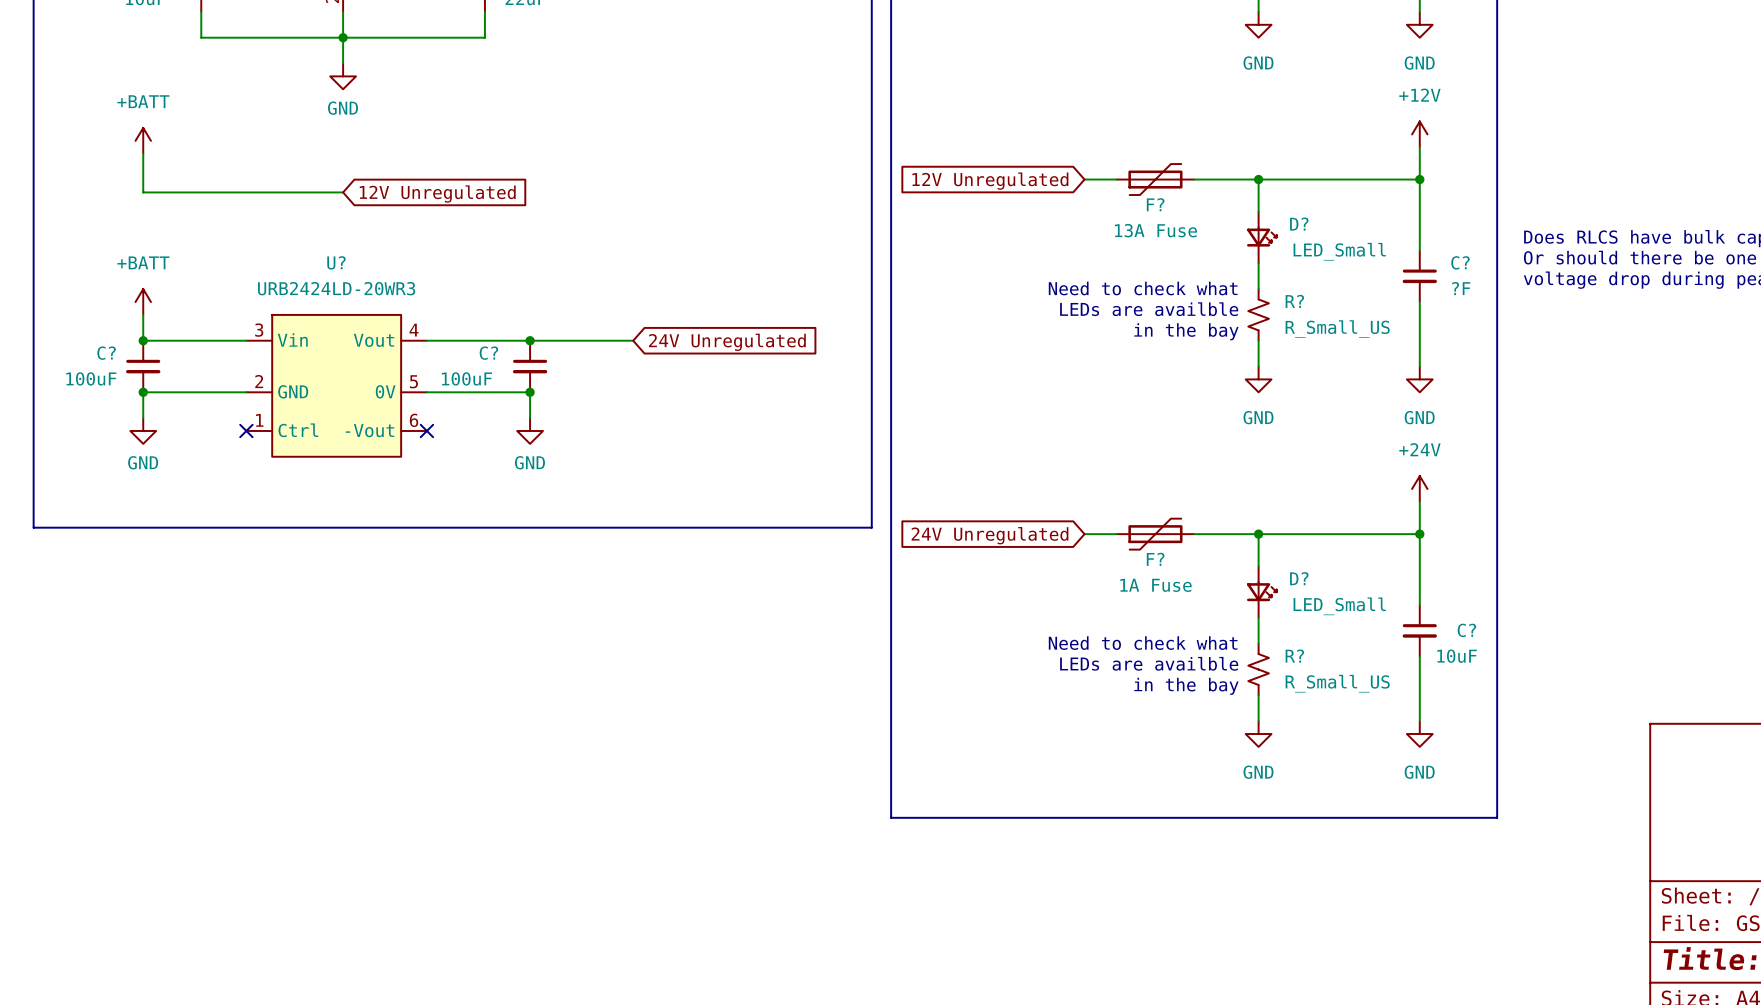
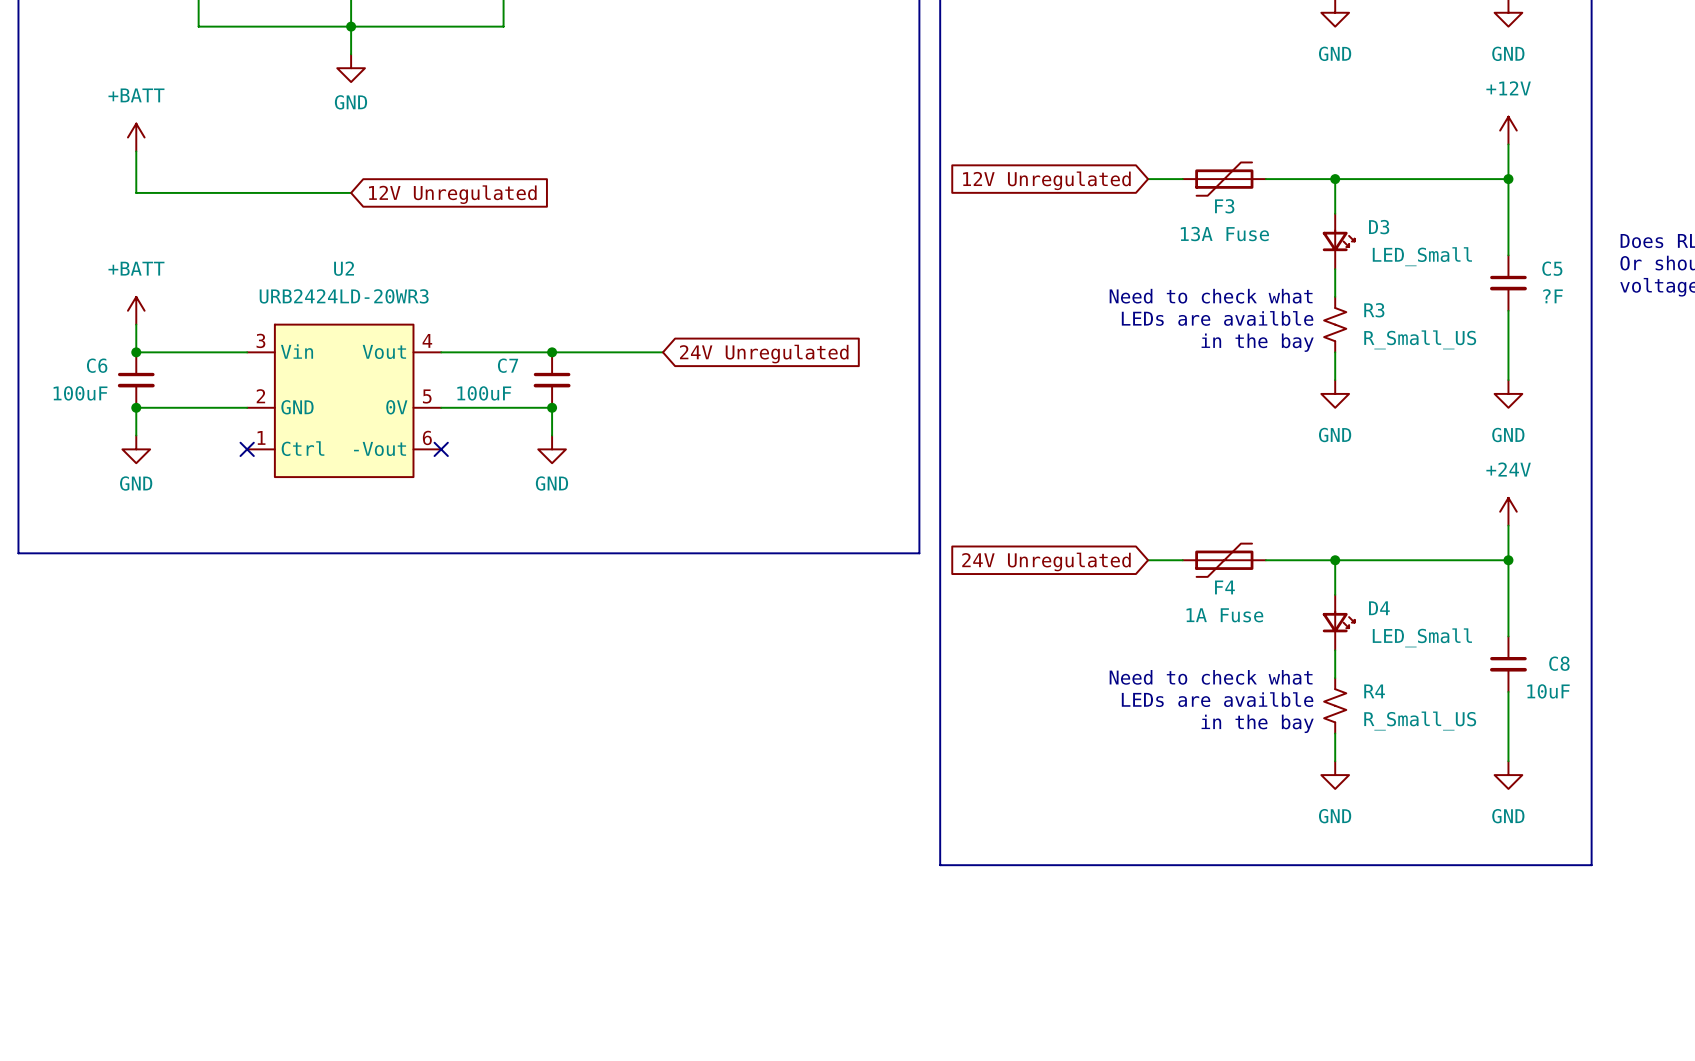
F? name: F? (1155, 204) -> F3 (1224, 206)
D? name: D? (1299, 224) -> D3 (1379, 227)
U? name: U? (336, 262) -> U2 (344, 268)
C? name: C? (1460, 262) -> C5 (1552, 268)
R? name: R? (1294, 301) -> R3 (1374, 310)
C? name: C? (106, 353) -> C6 (97, 365)
C? name: C? (488, 353) -> C7 (508, 365)
F? name: F? (1155, 559) -> F4 (1224, 587)
D? name: D? (1299, 578) -> D4 (1379, 608)
C? name: C? (1466, 630) -> C8 (1559, 663)
R? name: R? (1294, 656) -> R4 (1374, 691)

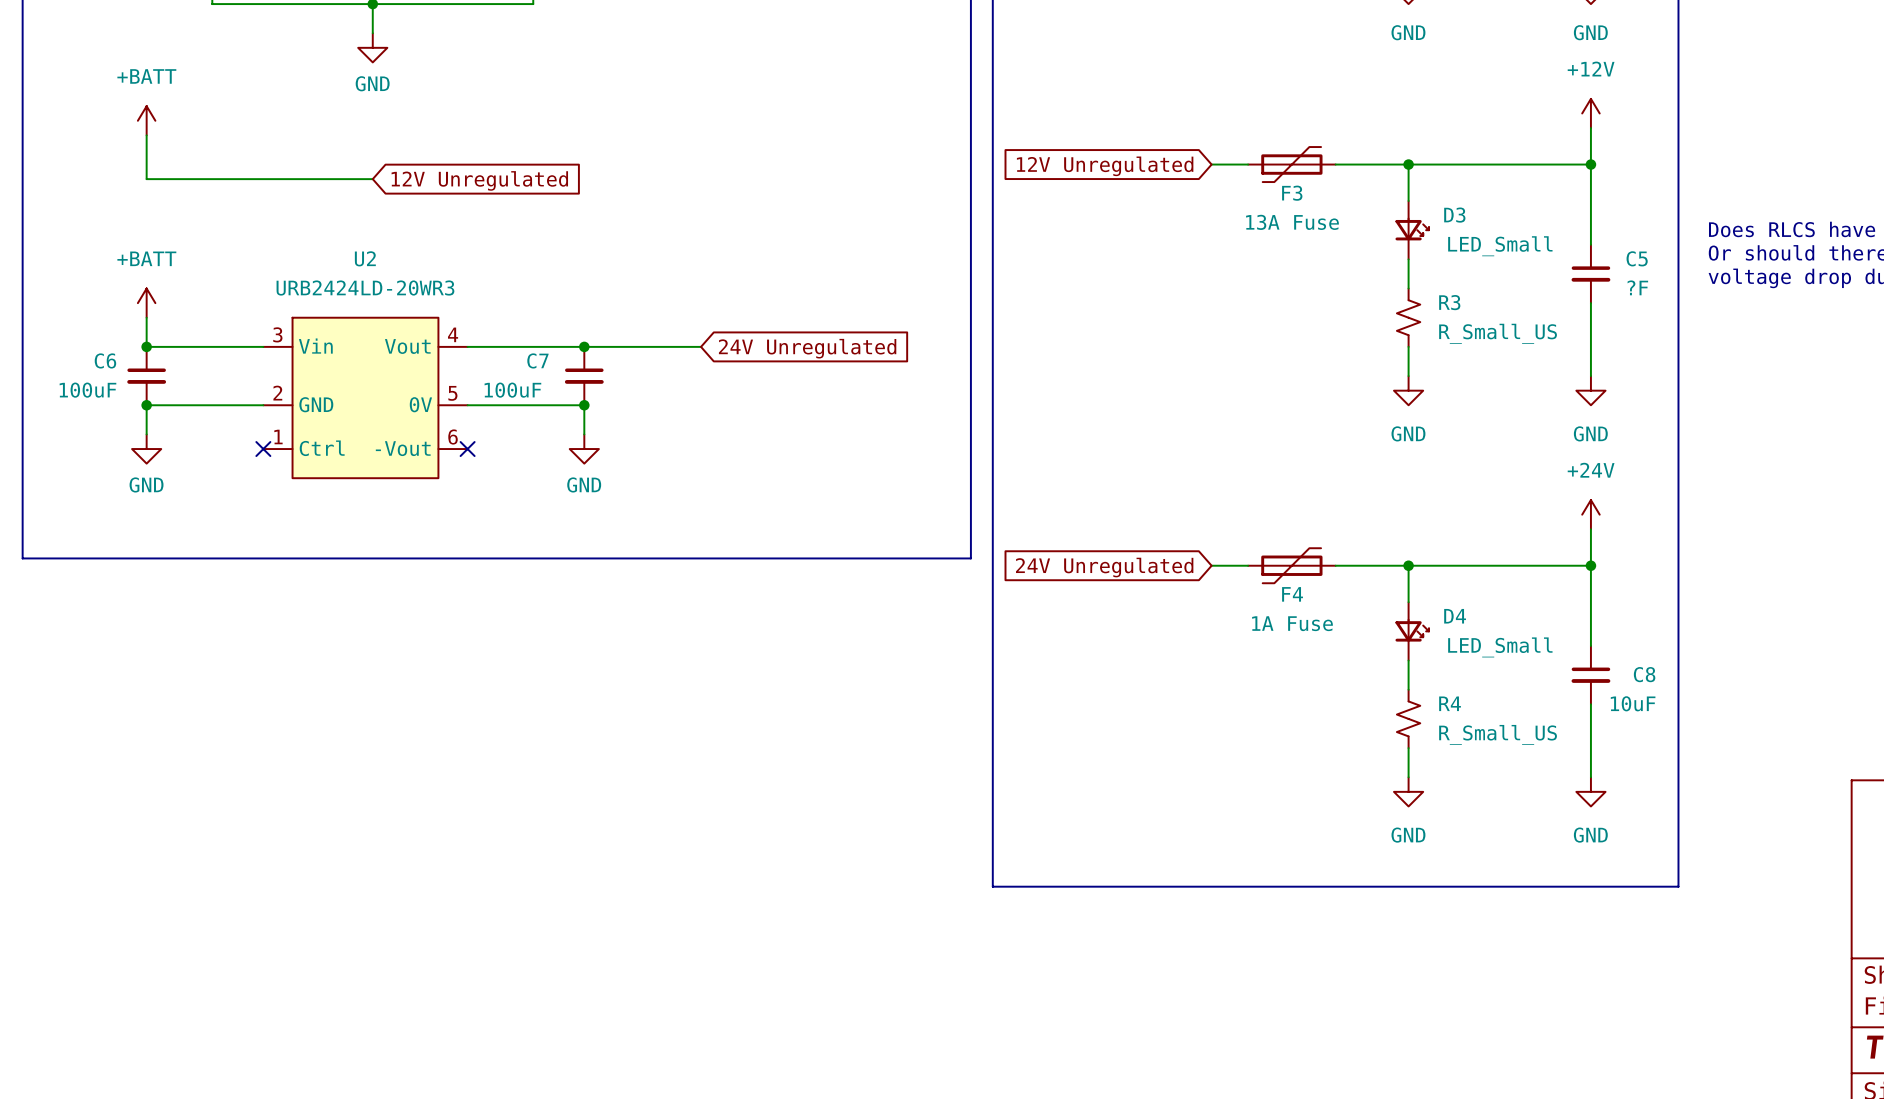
text: Need to check what (1211, 296) -> none
text: LEDs are availble (1217, 318) -> none
text: in the bay (1257, 342) -> none
text: Need to check what (1211, 677) -> none
text: LEDs are availble (1217, 699) -> none
text: in the bay (1257, 723) -> none

